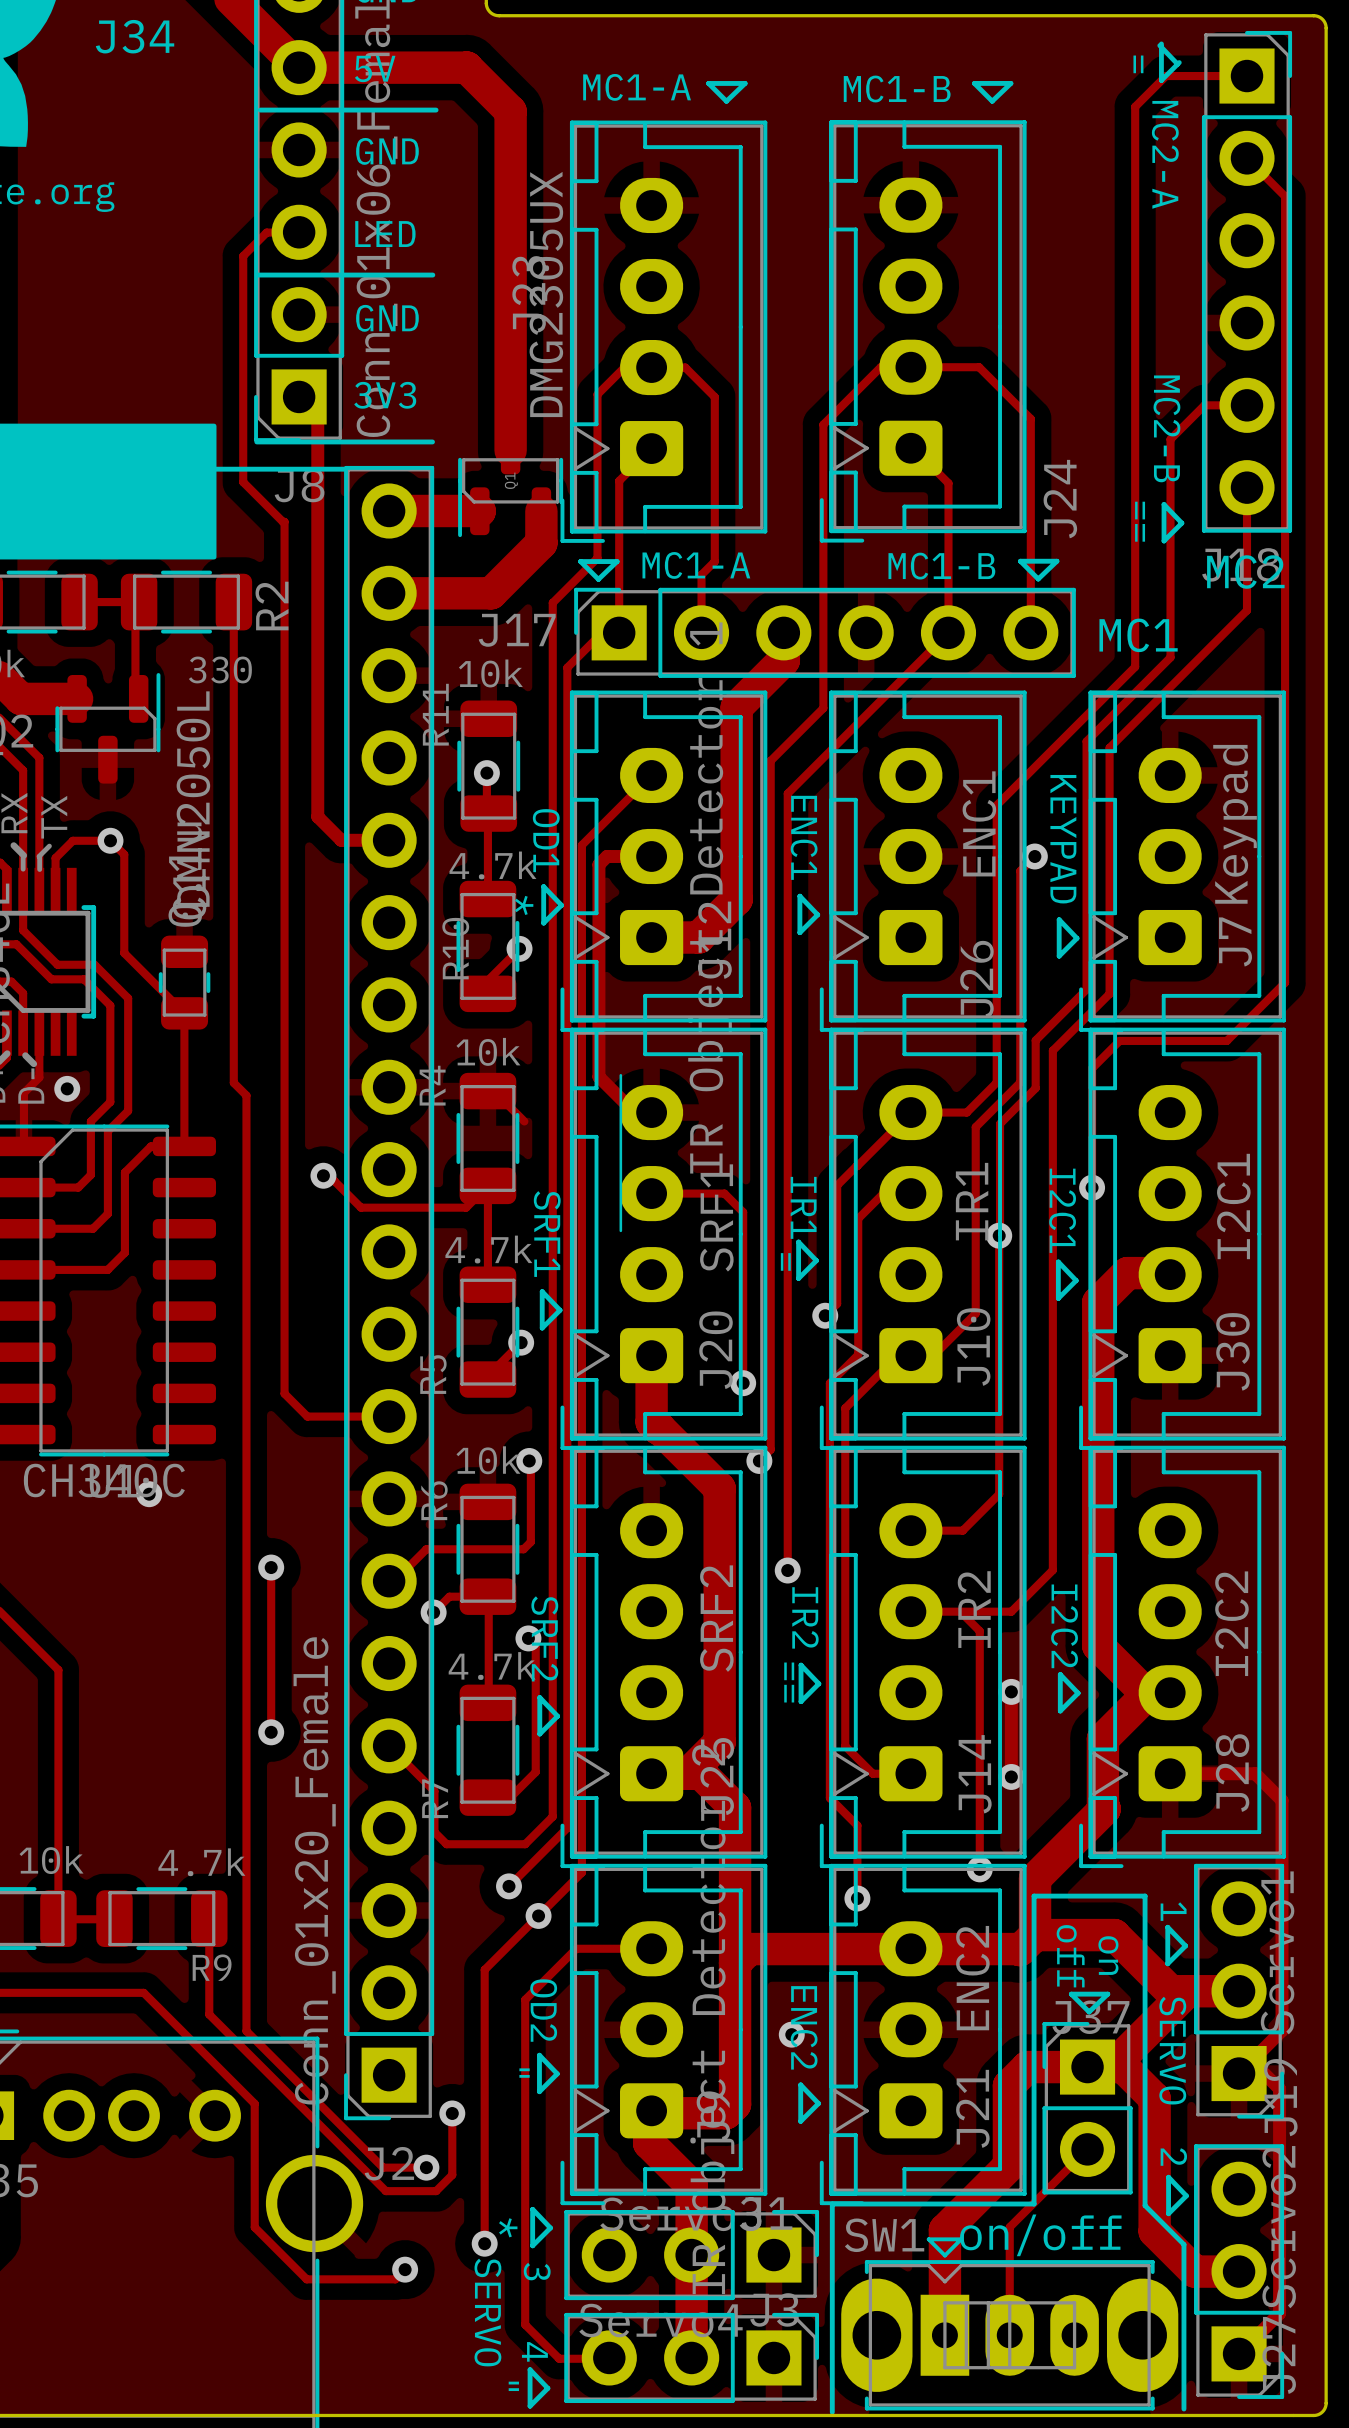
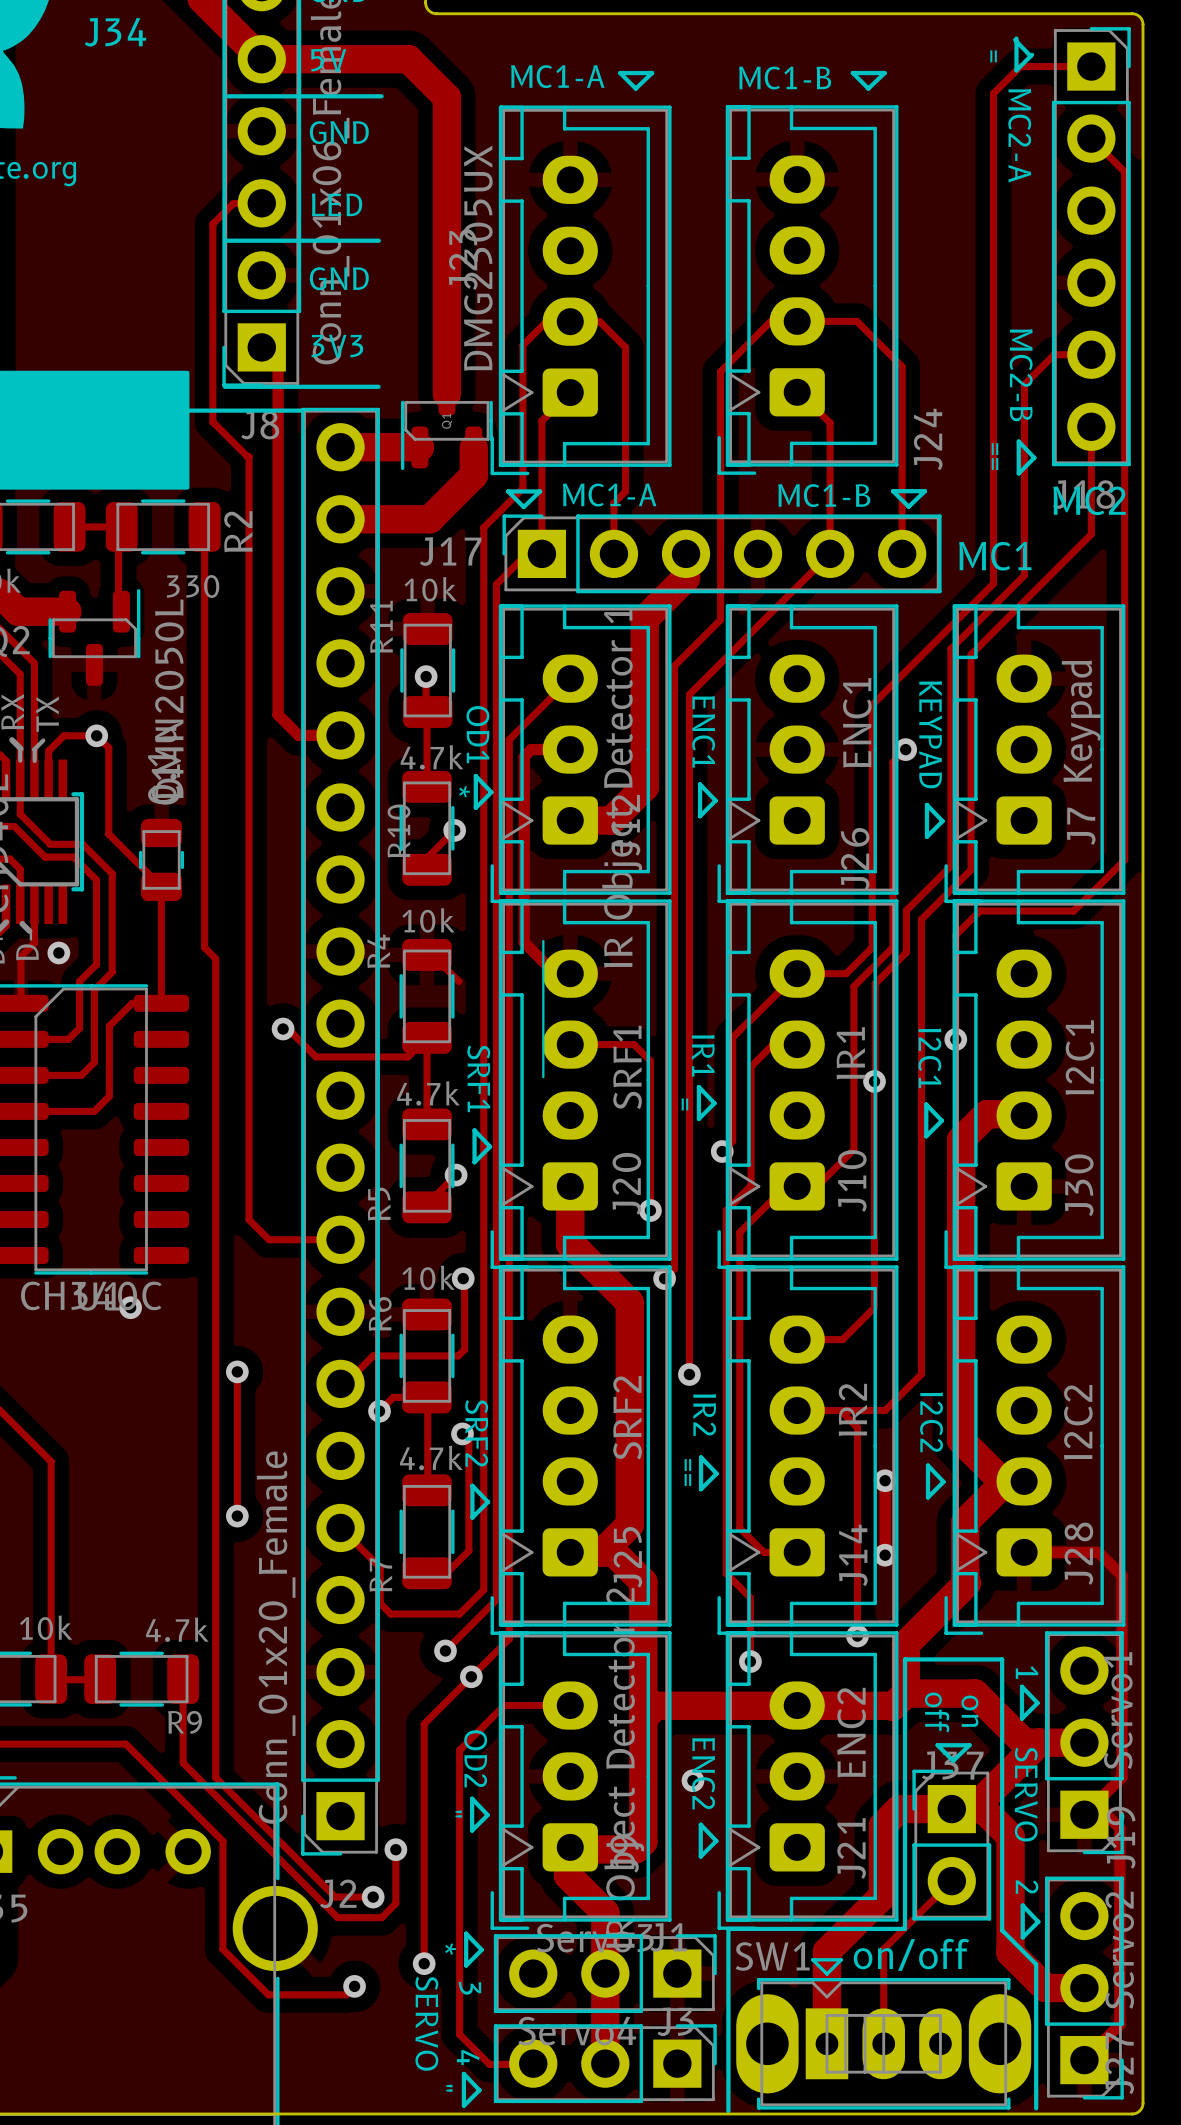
board edge: (1293, 15) (1317, 16) (1323, 20) (1326, 28) (1326, 2403) (1323, 2410) (1317, 2414) (1293, 2415) -> (1132, 13) (1139, 16) (1143, 24) (1143, 2103) (1139, 2110) (1132, 2114)

